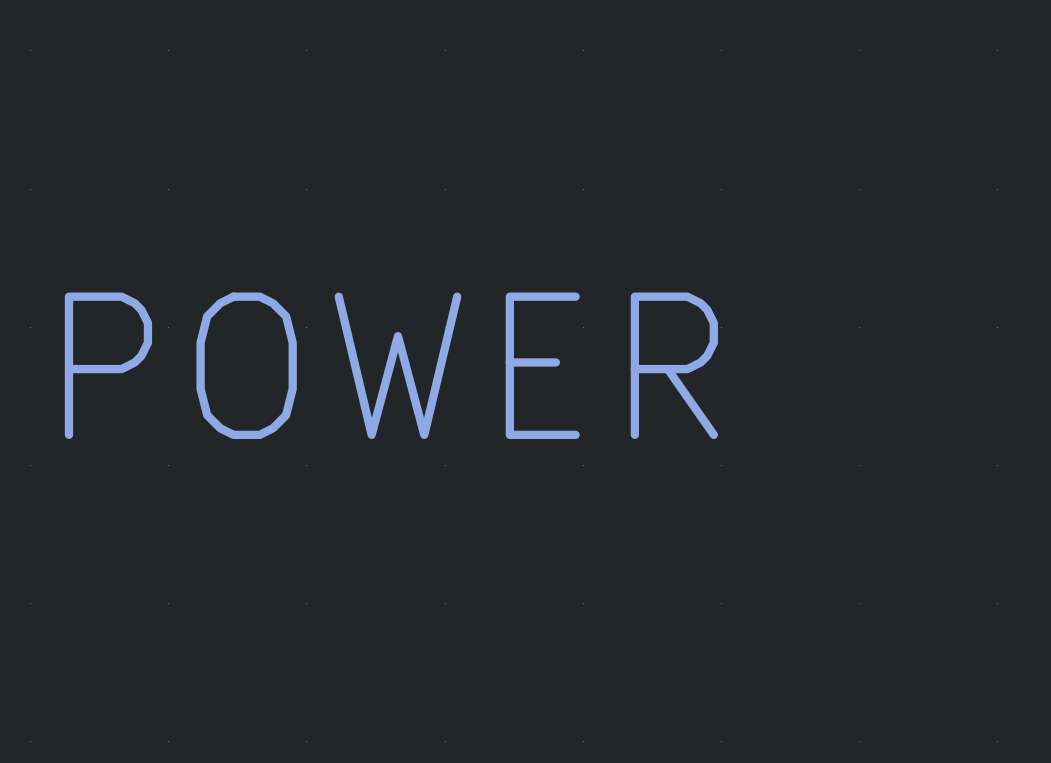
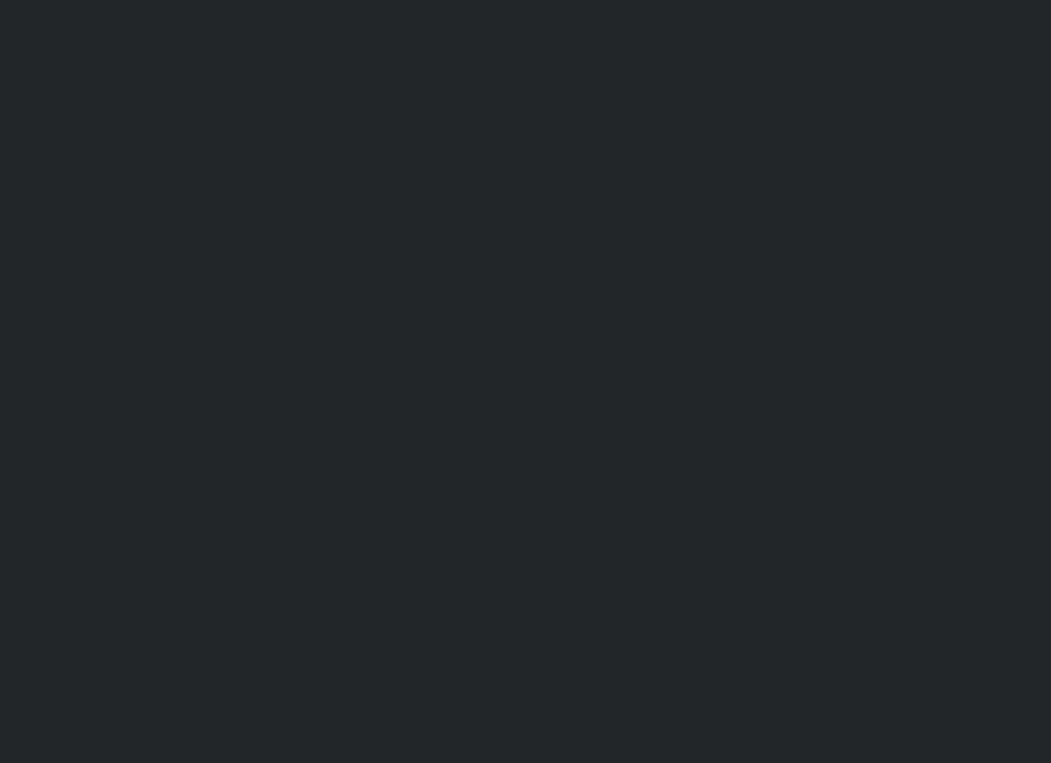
text: POWER (391, 365) -> none

